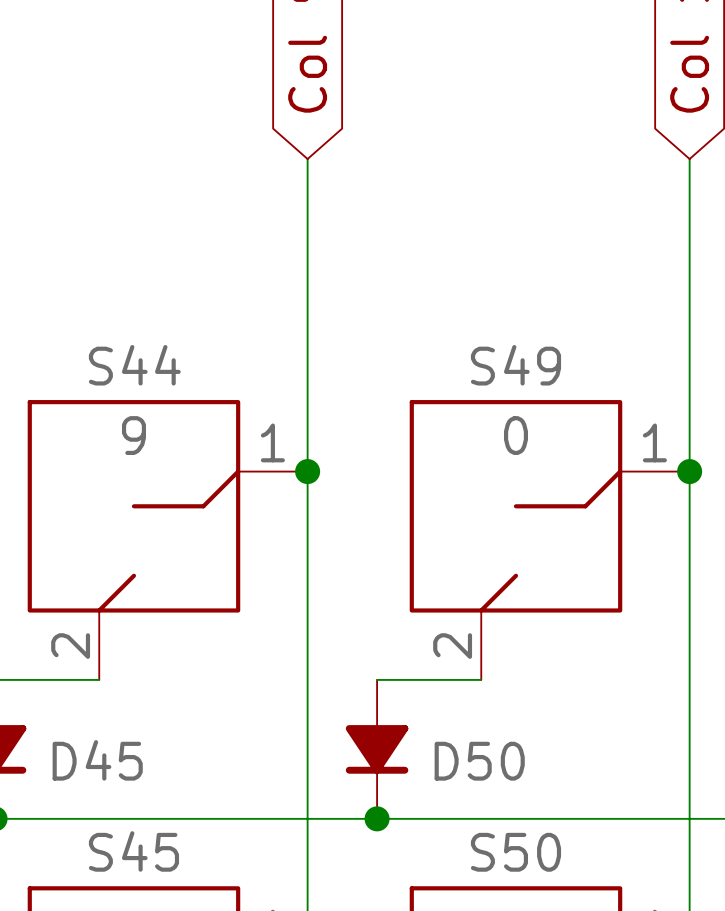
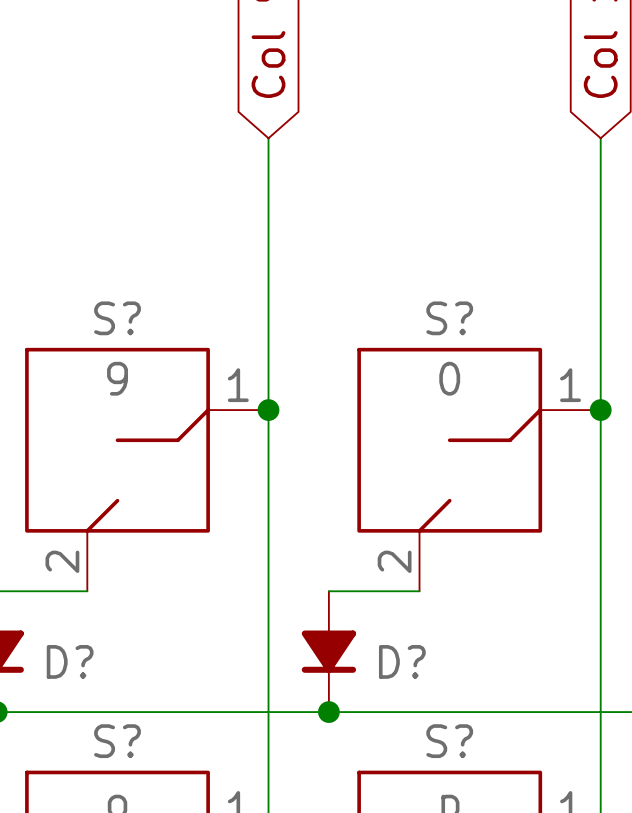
S44 name: S44 (134, 365) -> S? (117, 318)
S49 name: S49 (515, 365) -> S? (449, 318)
D45 name: D45 (97, 760) -> D? (70, 661)
D50 name: D50 (479, 761) -> D? (402, 661)
S45 name: S45 (133, 851) -> S? (117, 741)
S50 name: S50 (515, 852) -> S? (449, 741)

